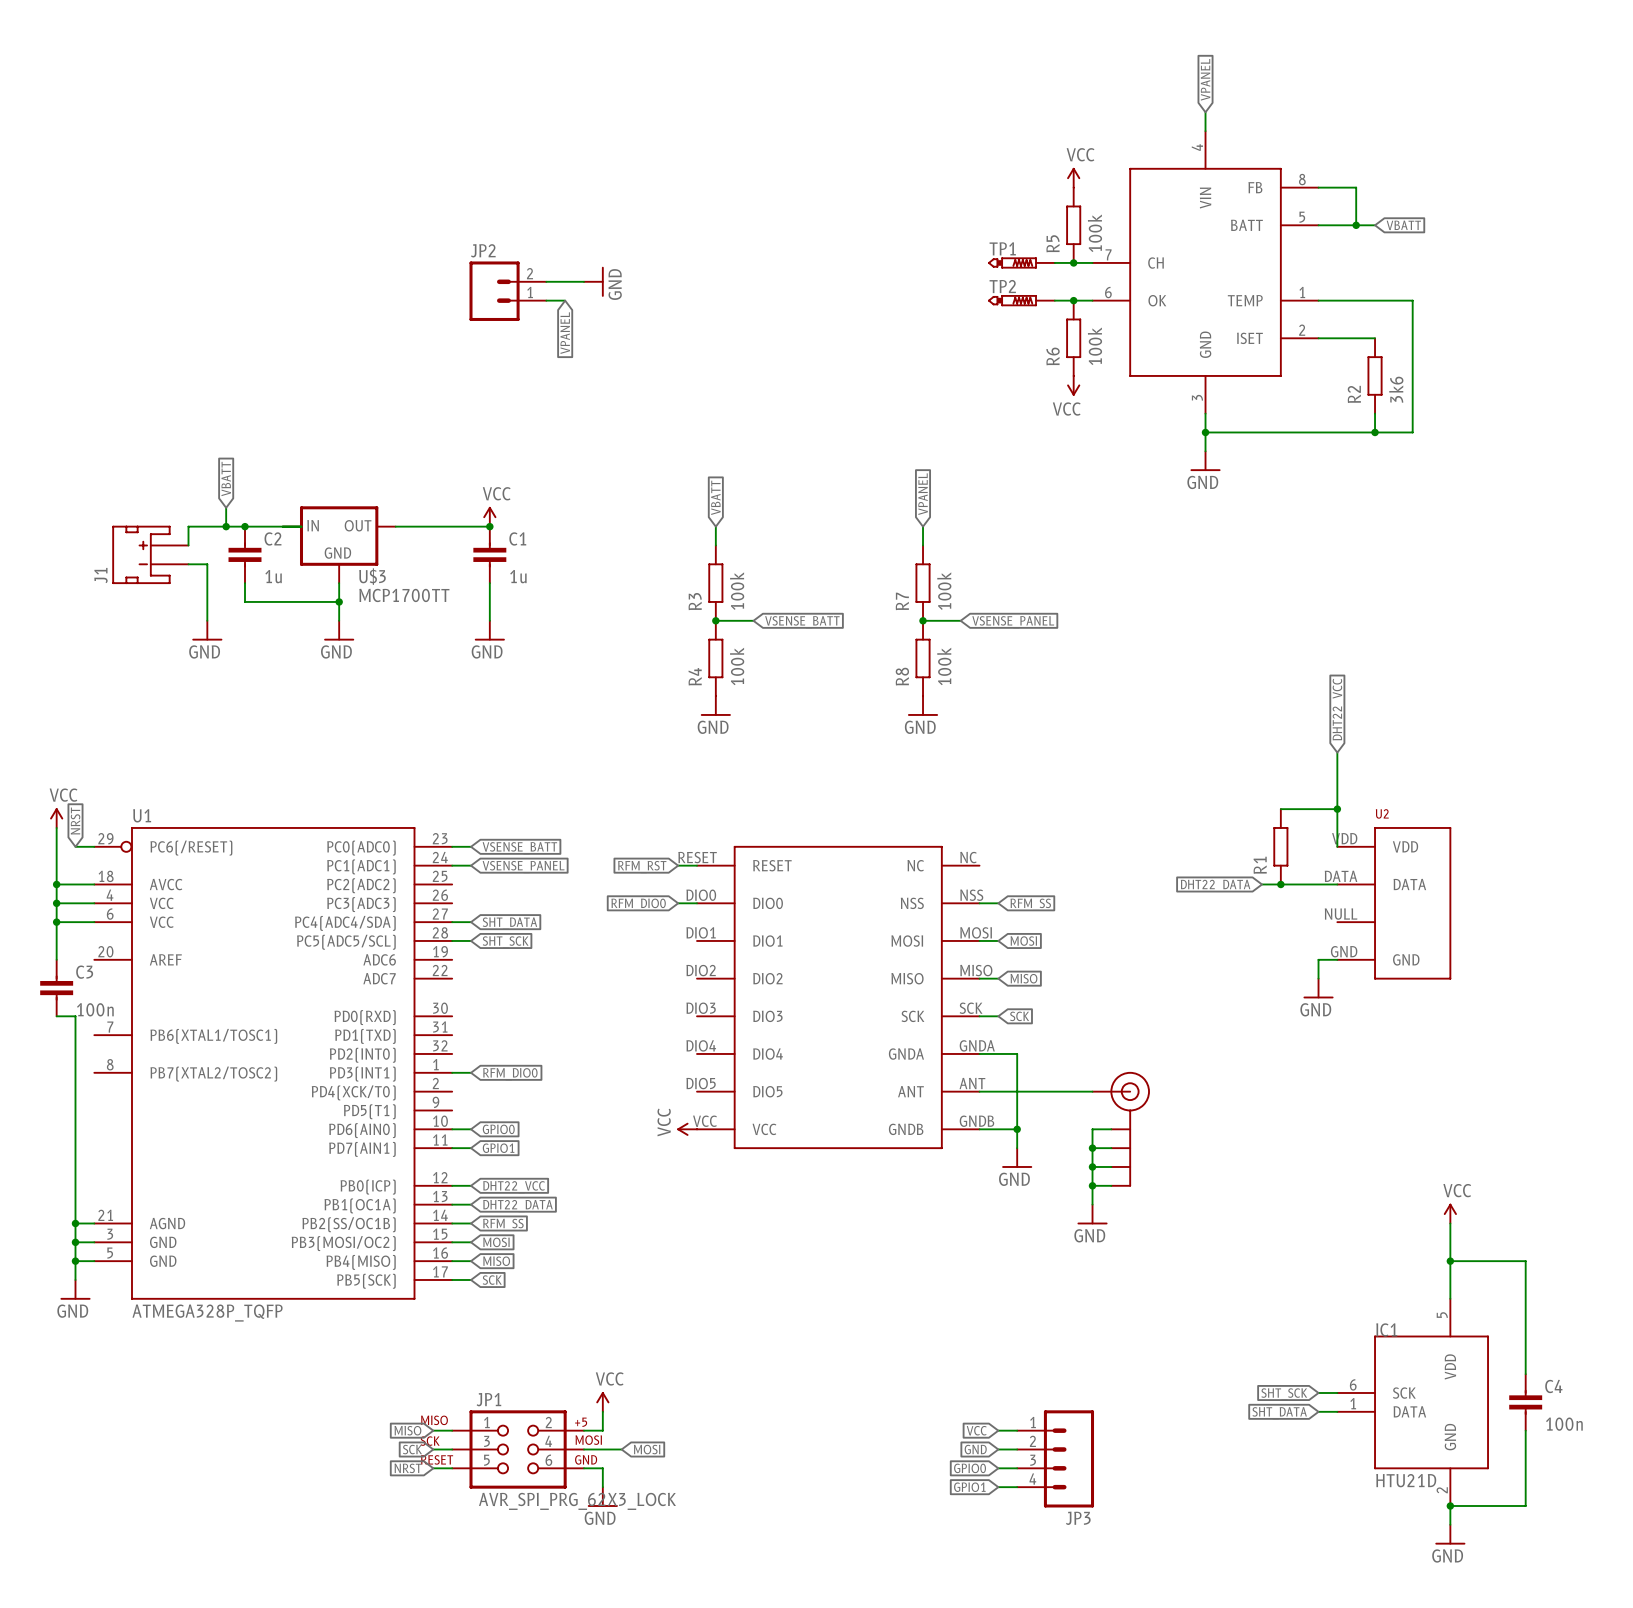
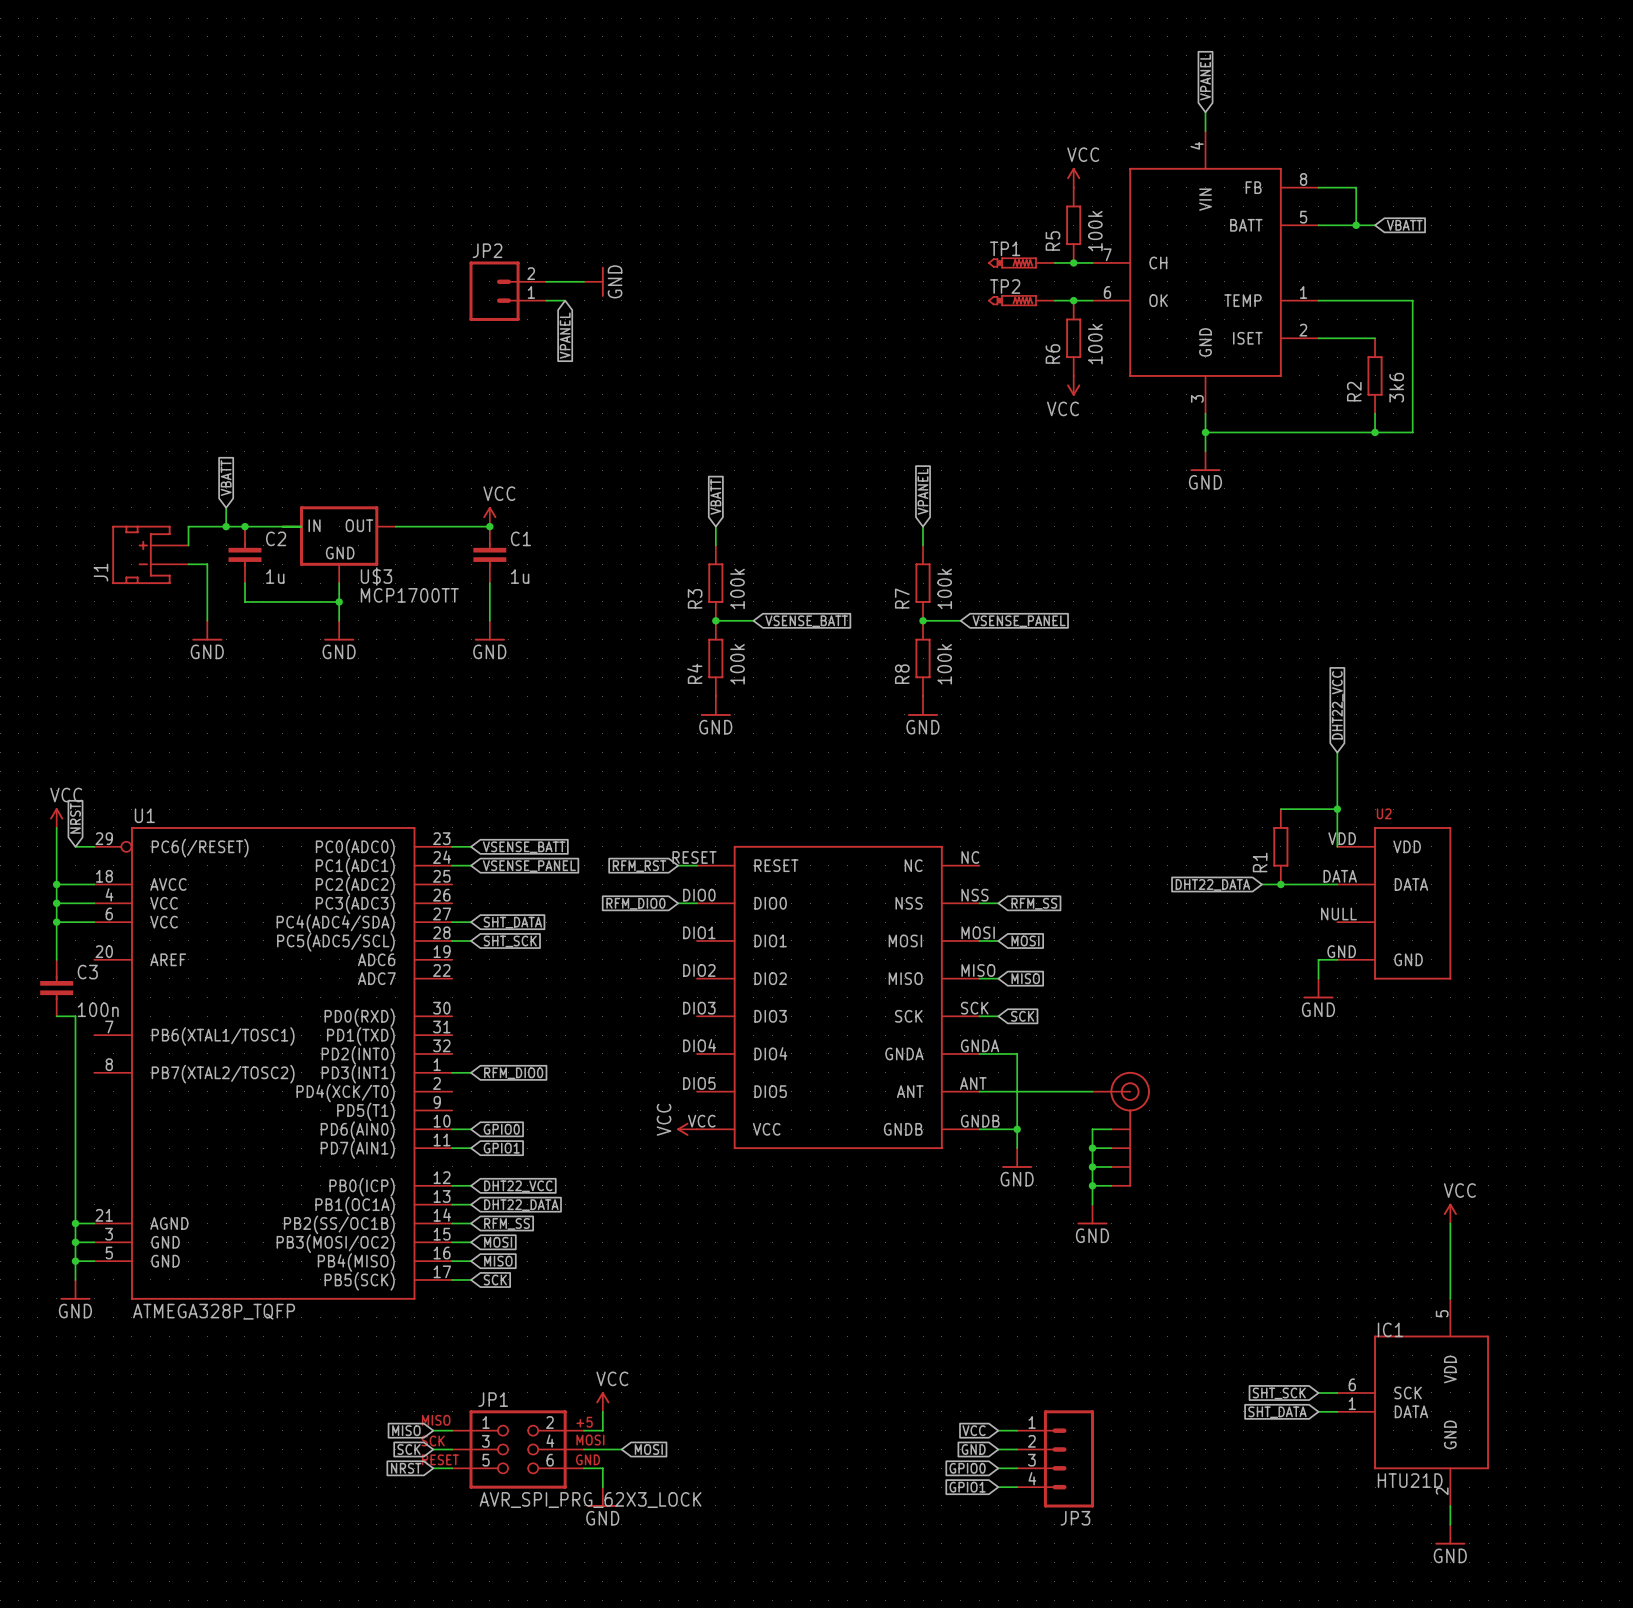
wire: (1450, 1261) (1525, 1261) (1525, 1374) -> none
junction: (1450, 1261) -> none
C4: 100n (1525, 1402) -> none
wire: (1525, 1430) (1525, 1505) (1450, 1505) -> none
junction: (1450, 1505) -> none

